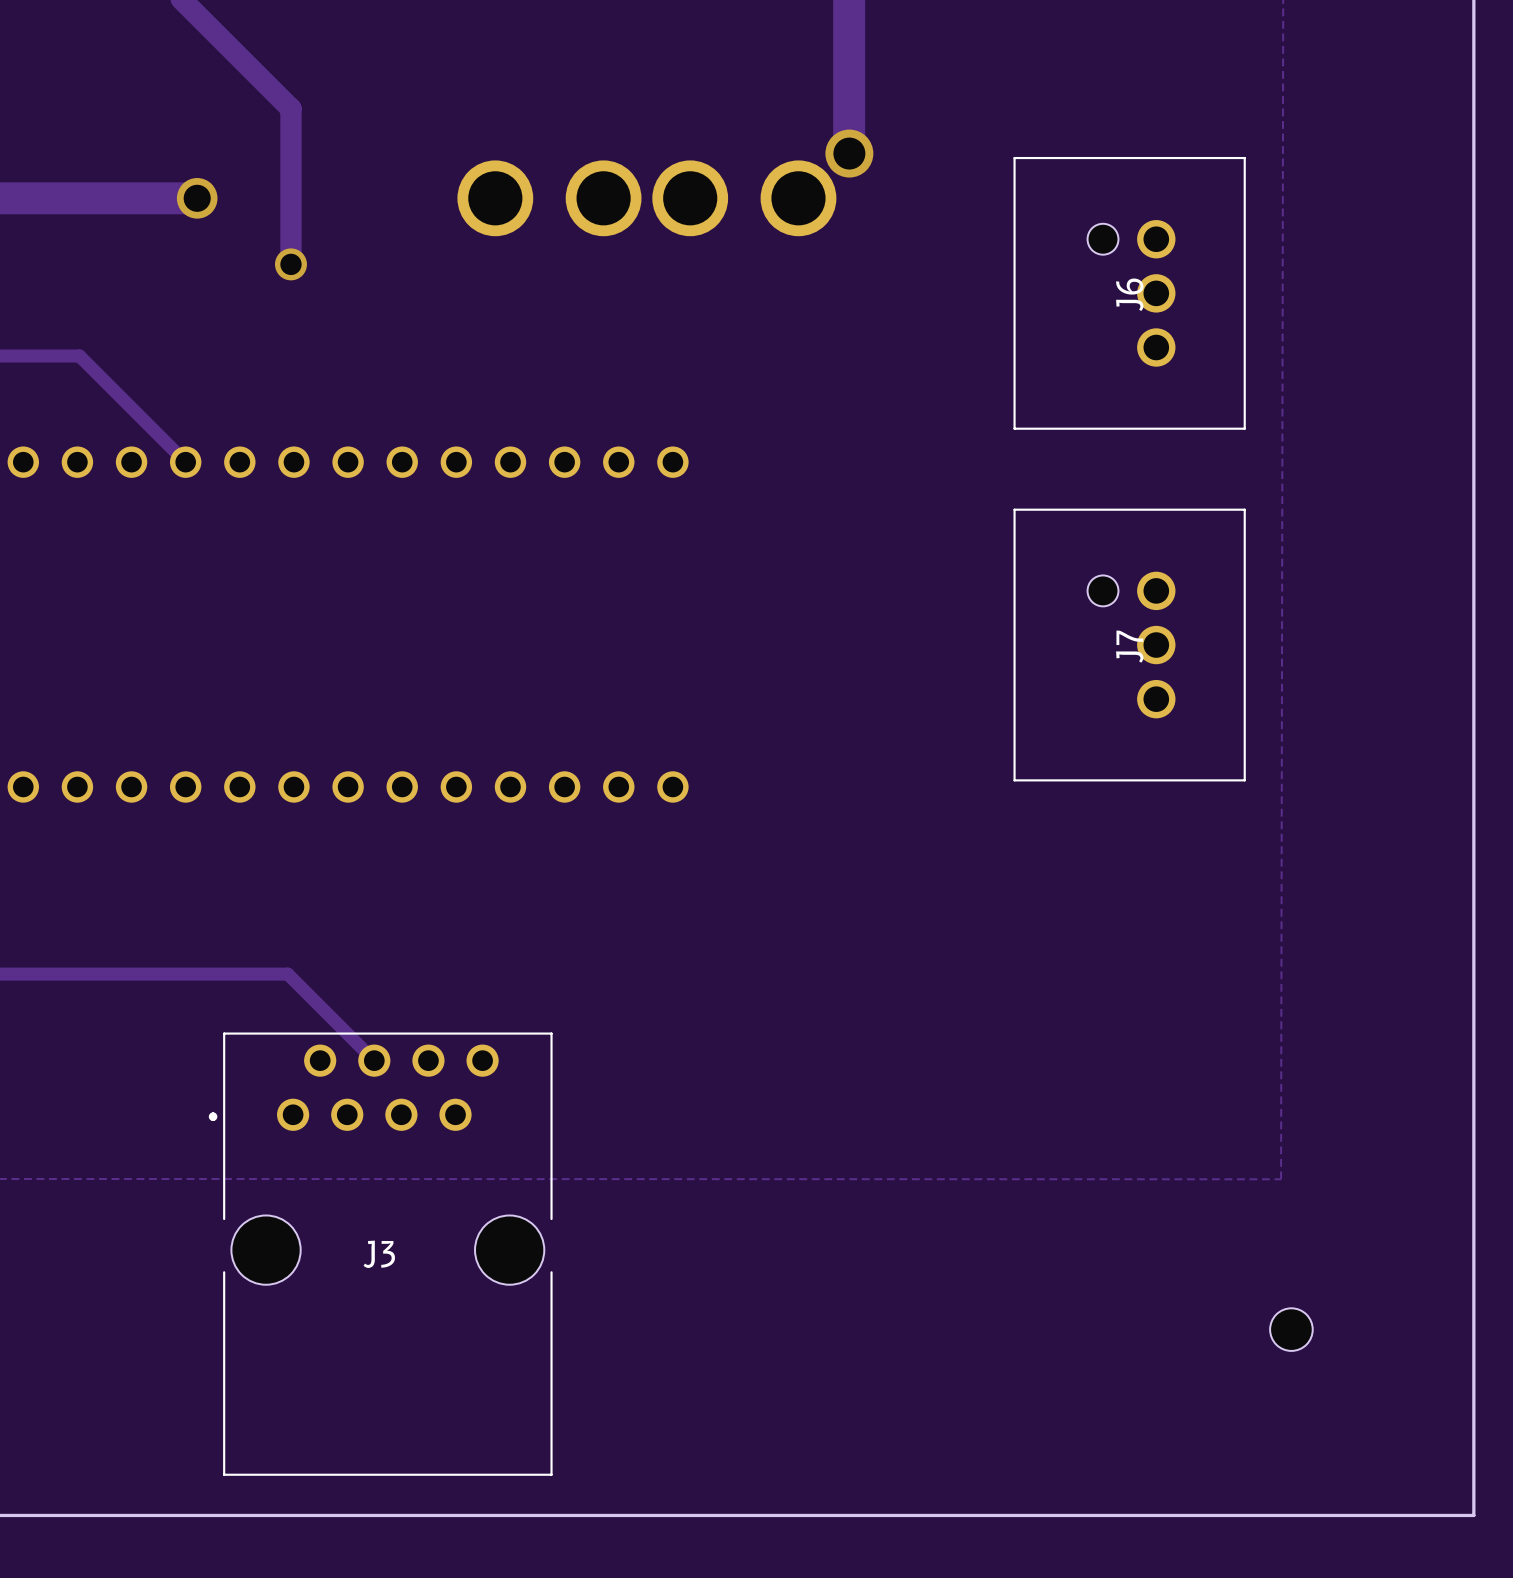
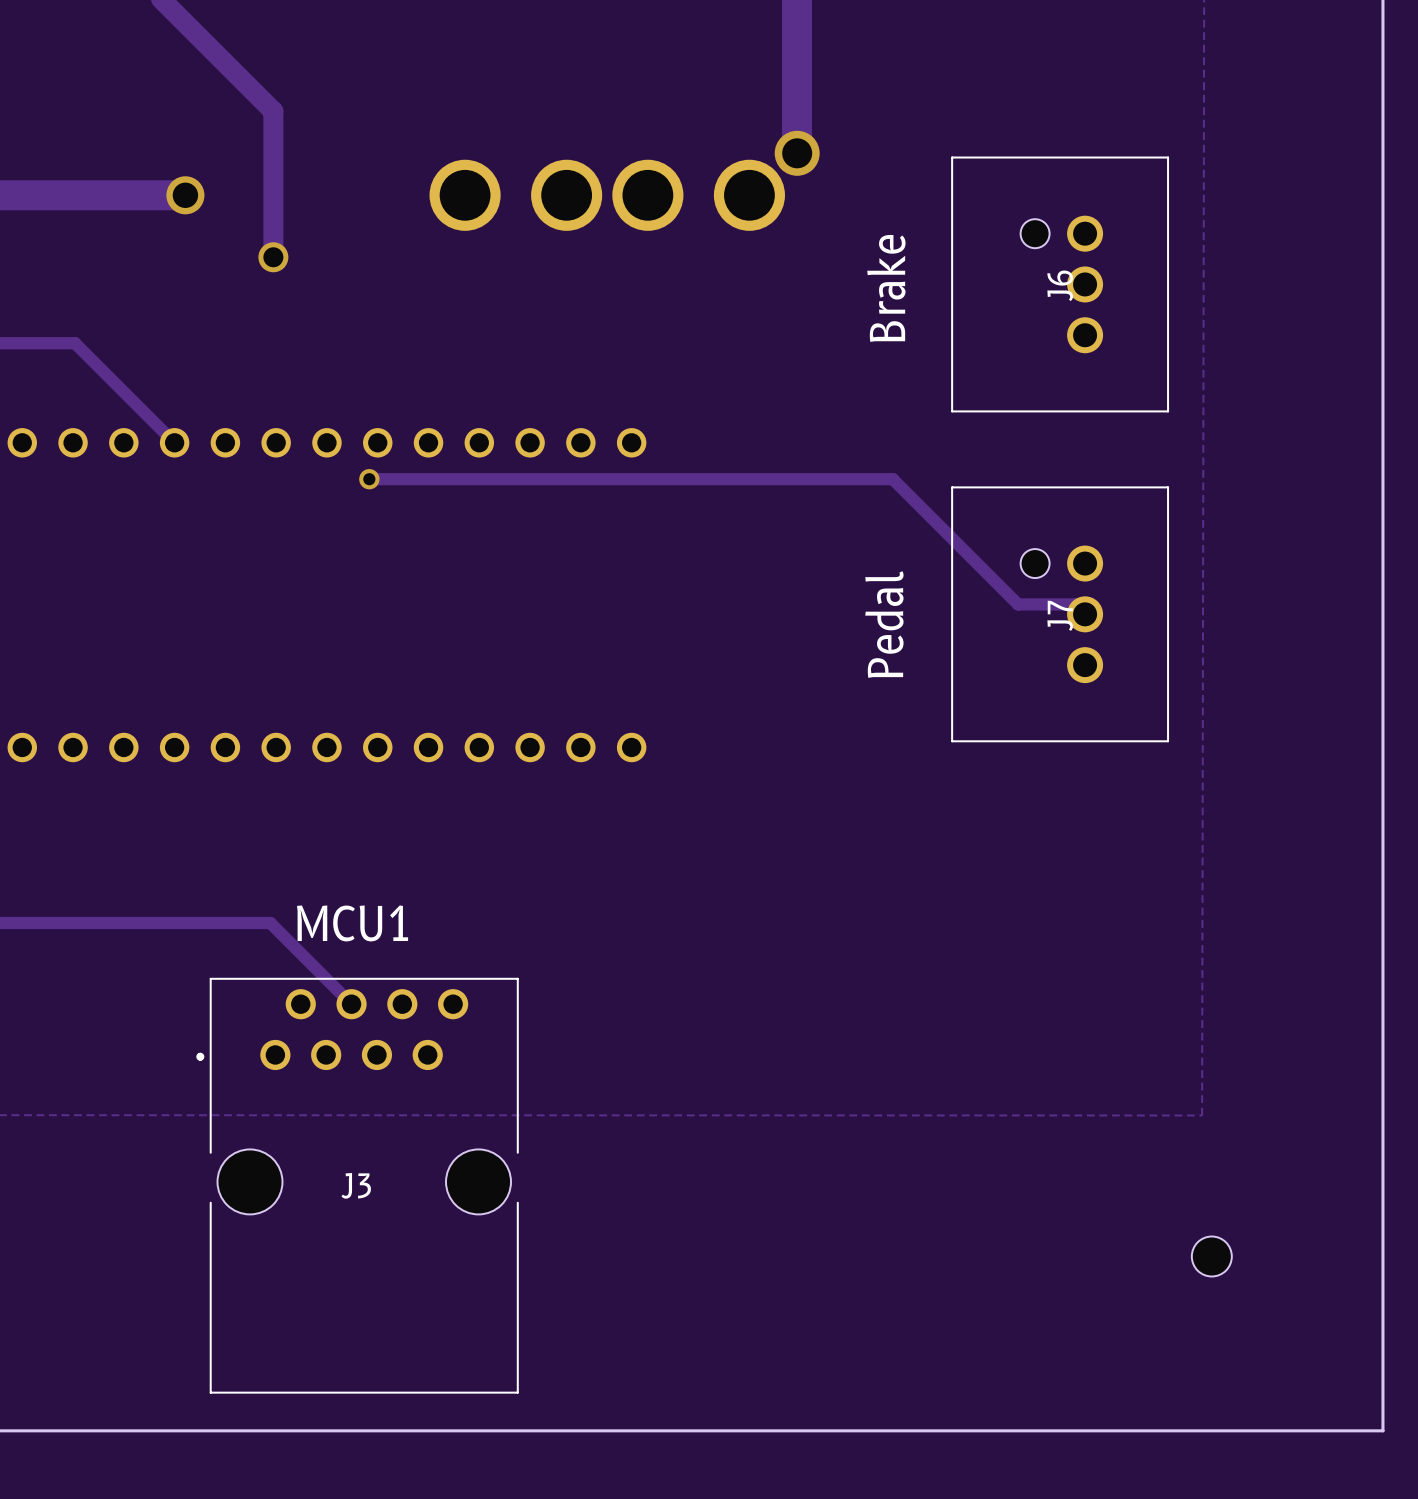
text: none -> Brake (886, 288)
track: none -> (369, 479) (892, 479) (1018, 604) (1075, 604) (1085, 614)
via: none -> (369, 479)
text: none -> Pedal (884, 624)
text: none -> MCU1 (352, 923)

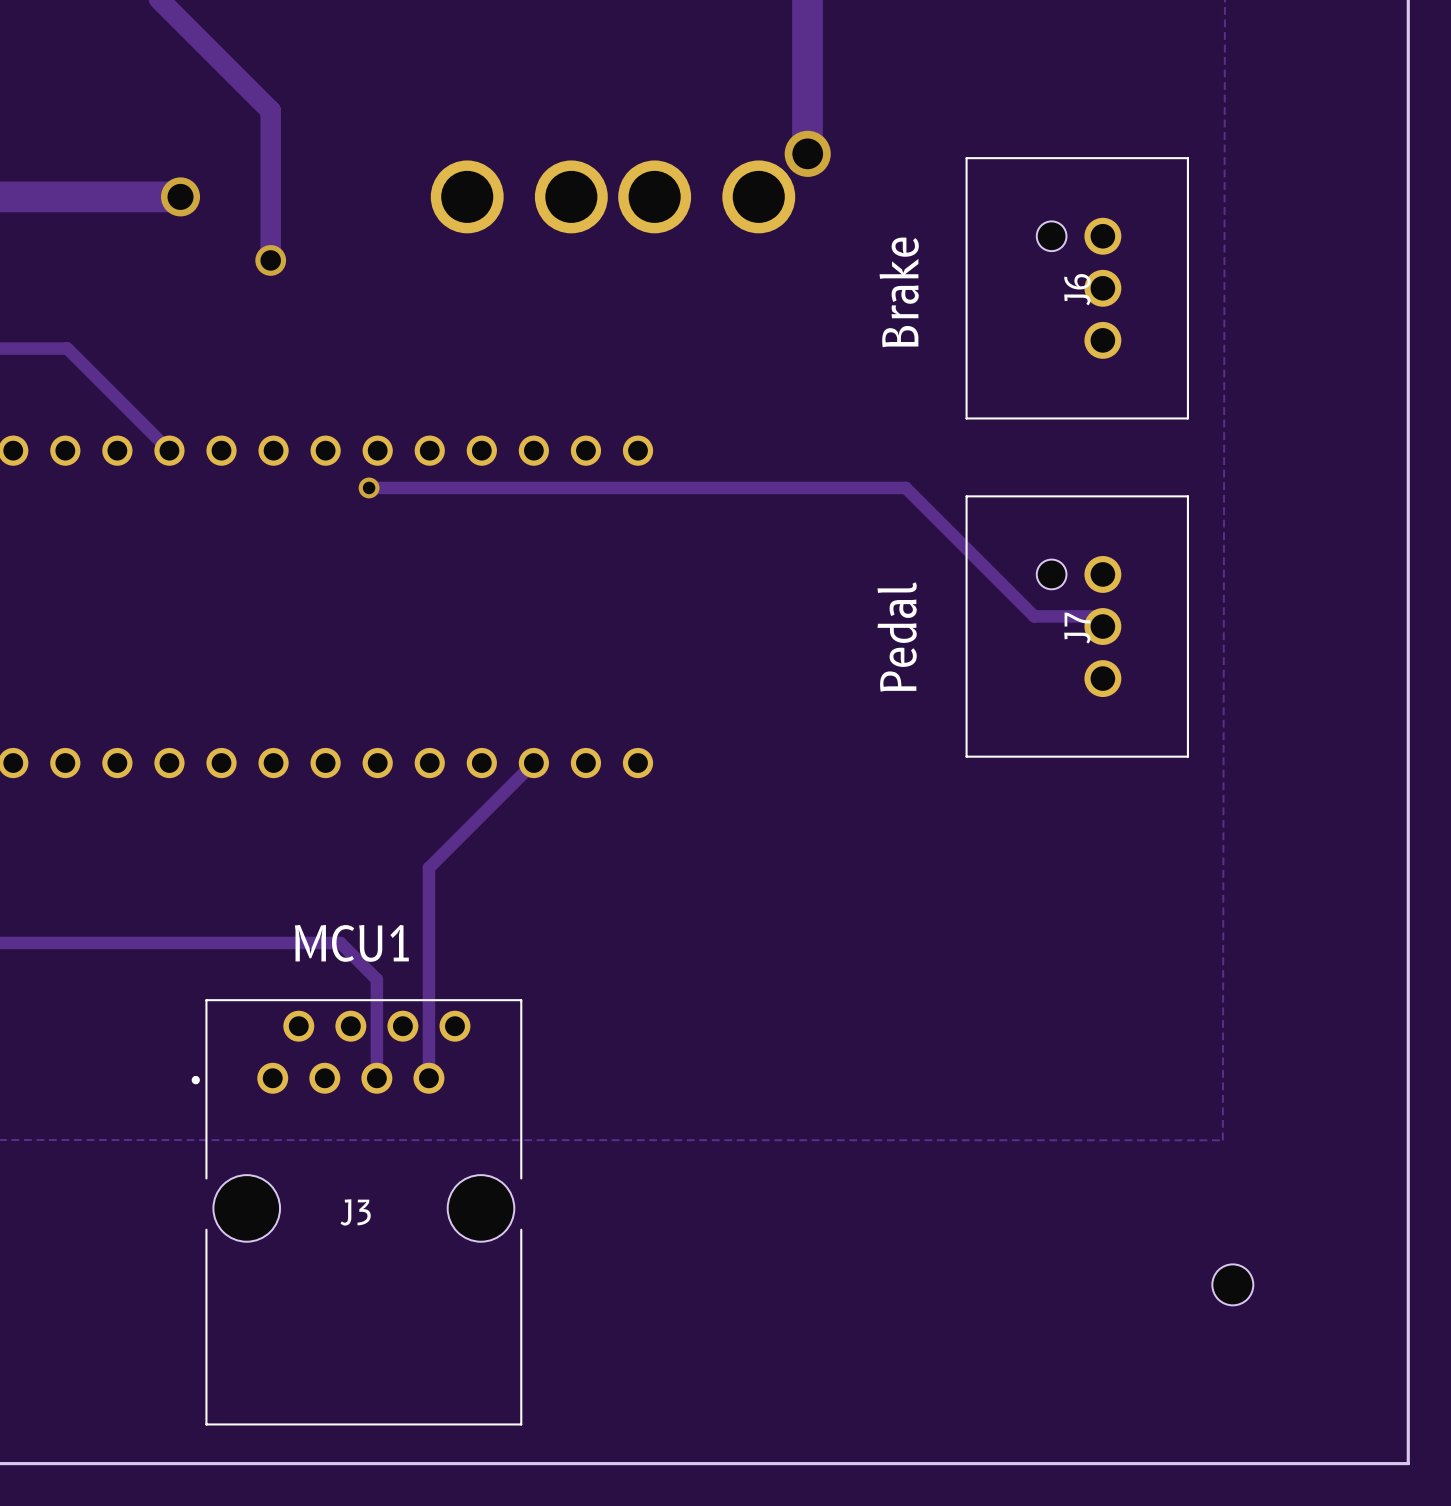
track: none -> (533, 763) (428, 867) (428, 1078)
track: (270, 923) (351, 1004) -> (267, 942) (340, 942) (376, 979) (376, 1078)

